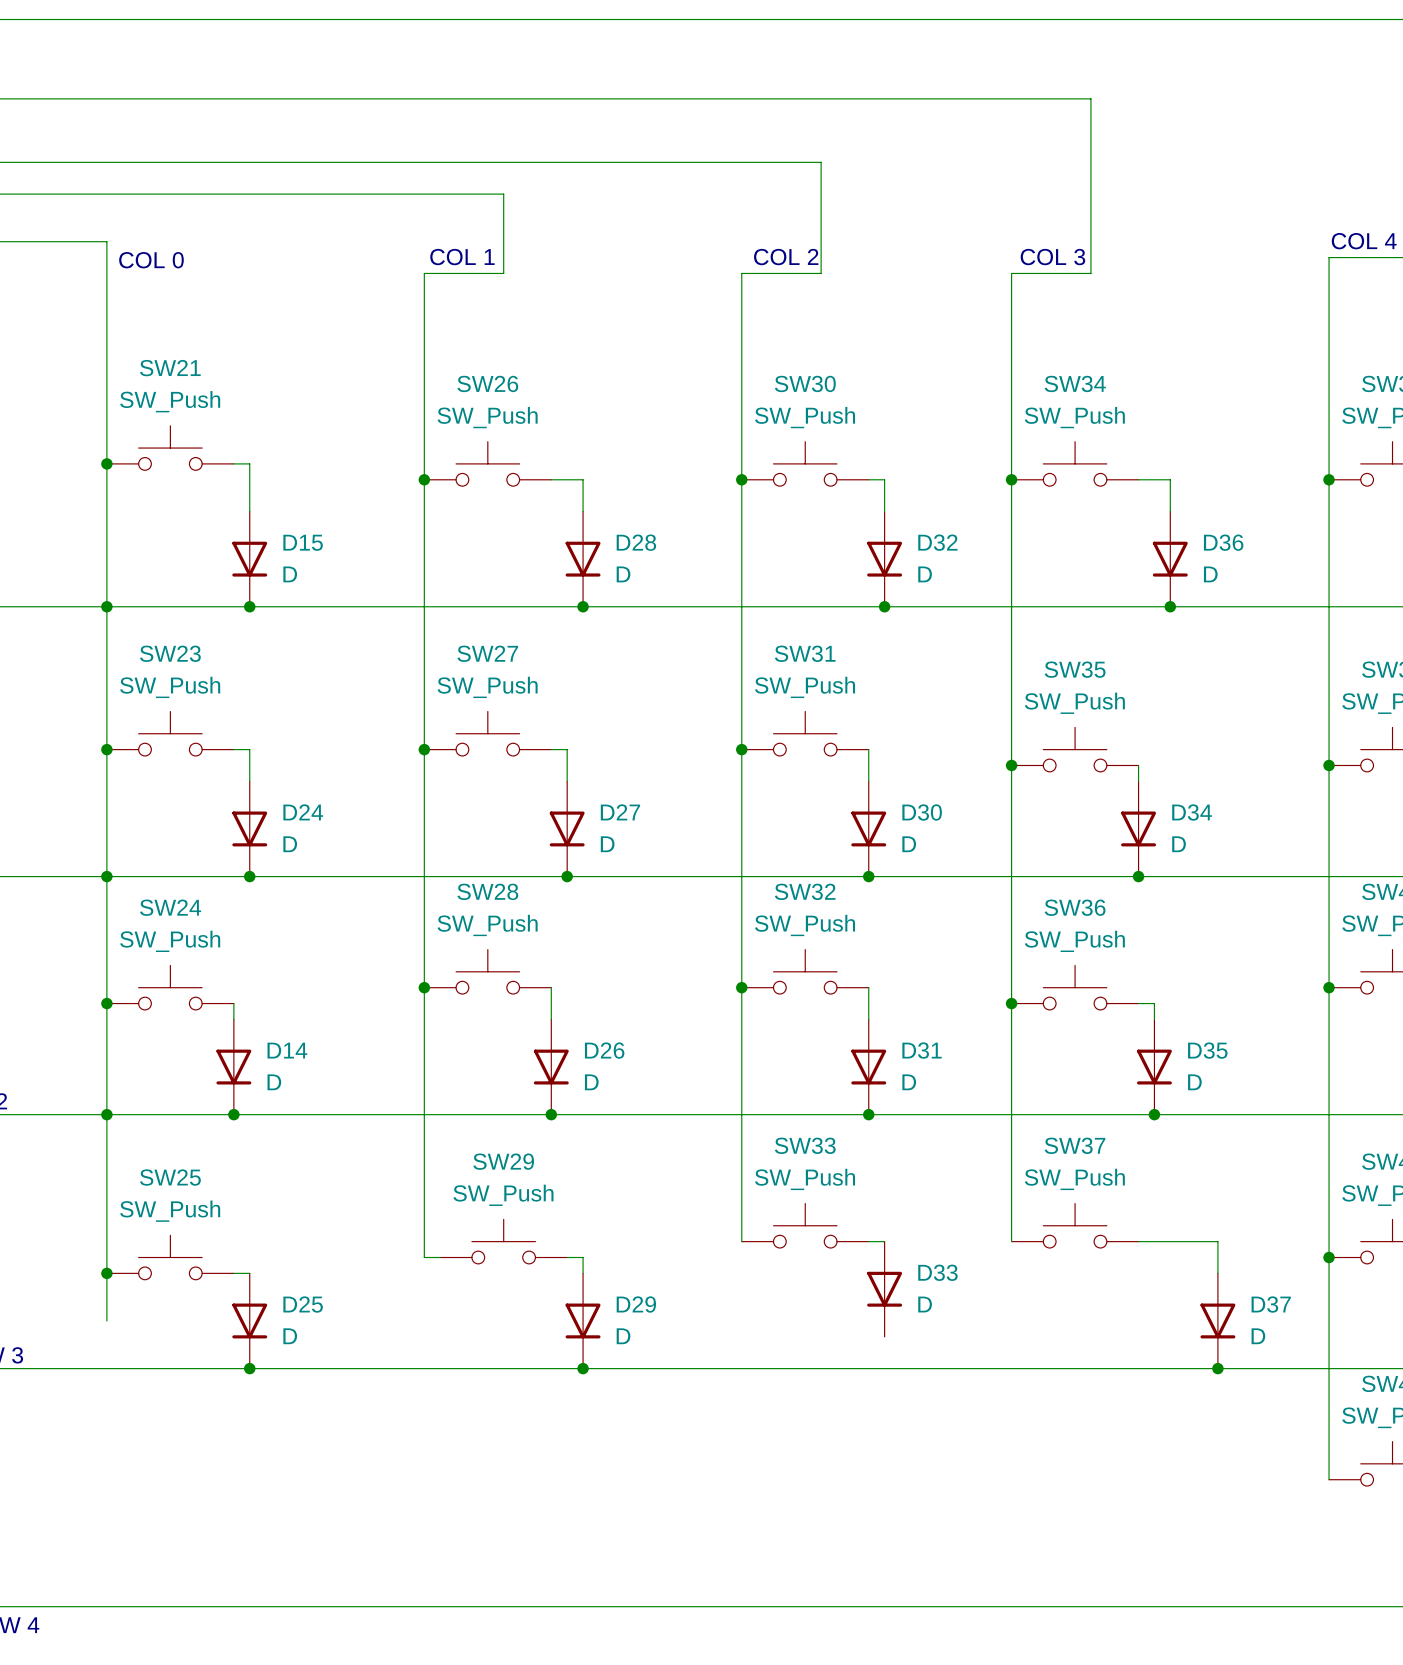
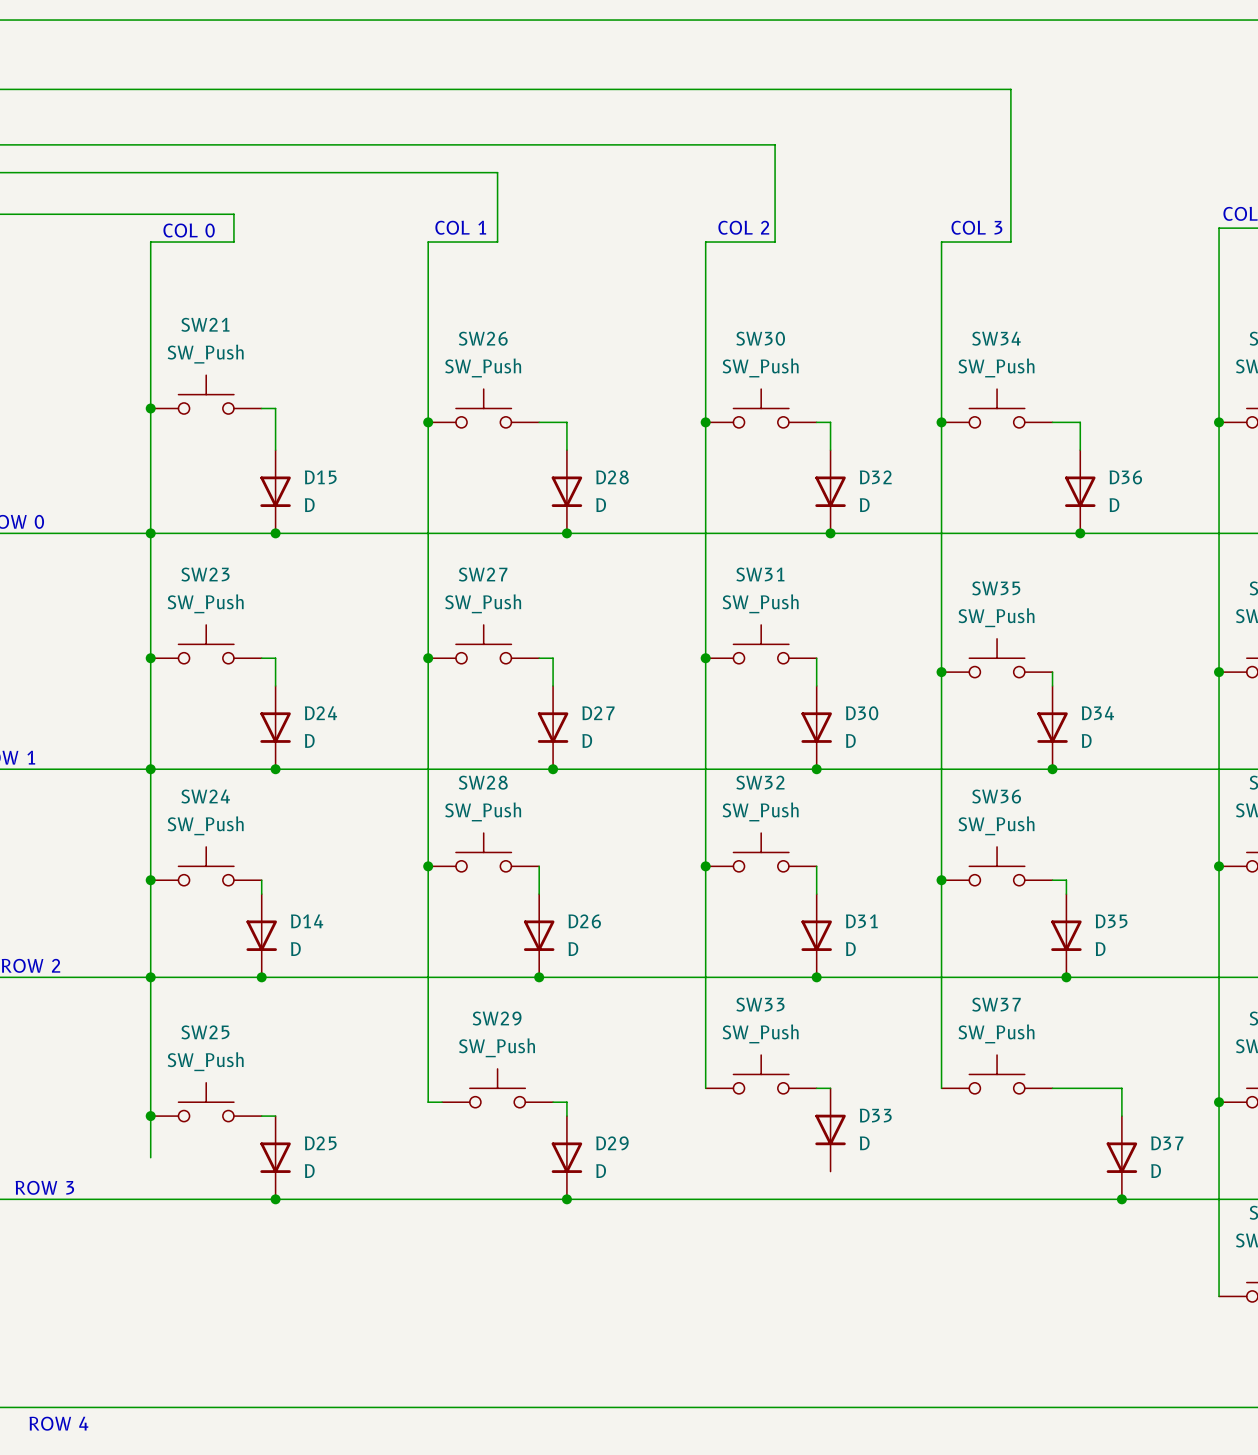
wire: (106, 241) (106, 273) -> (150, 214) (233, 214) (233, 242) (150, 242)

